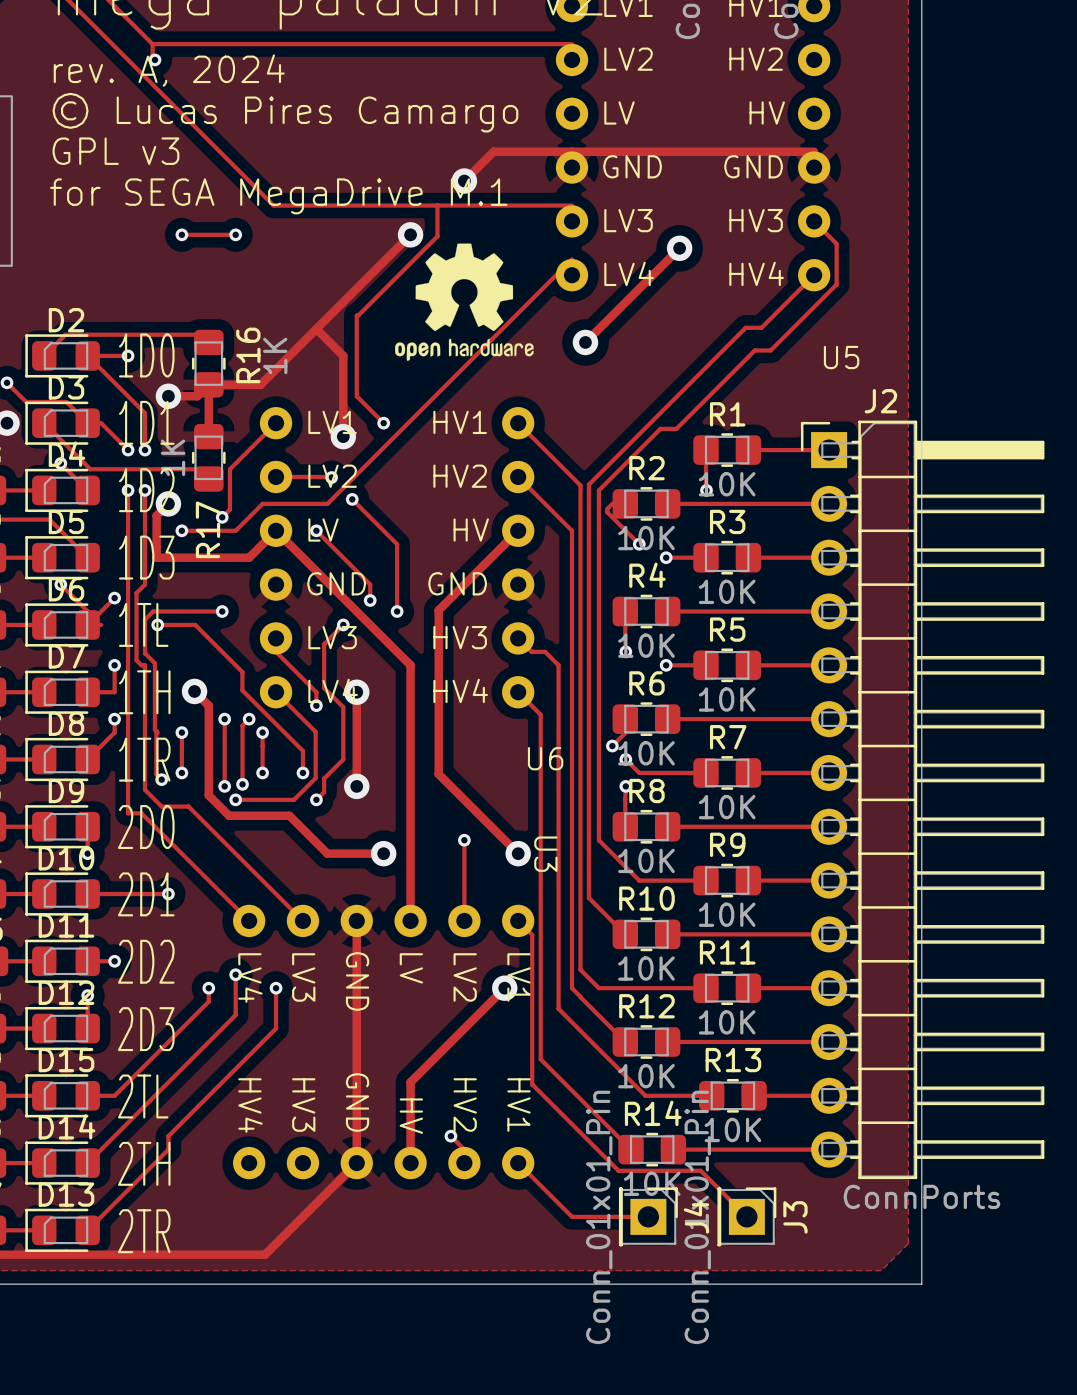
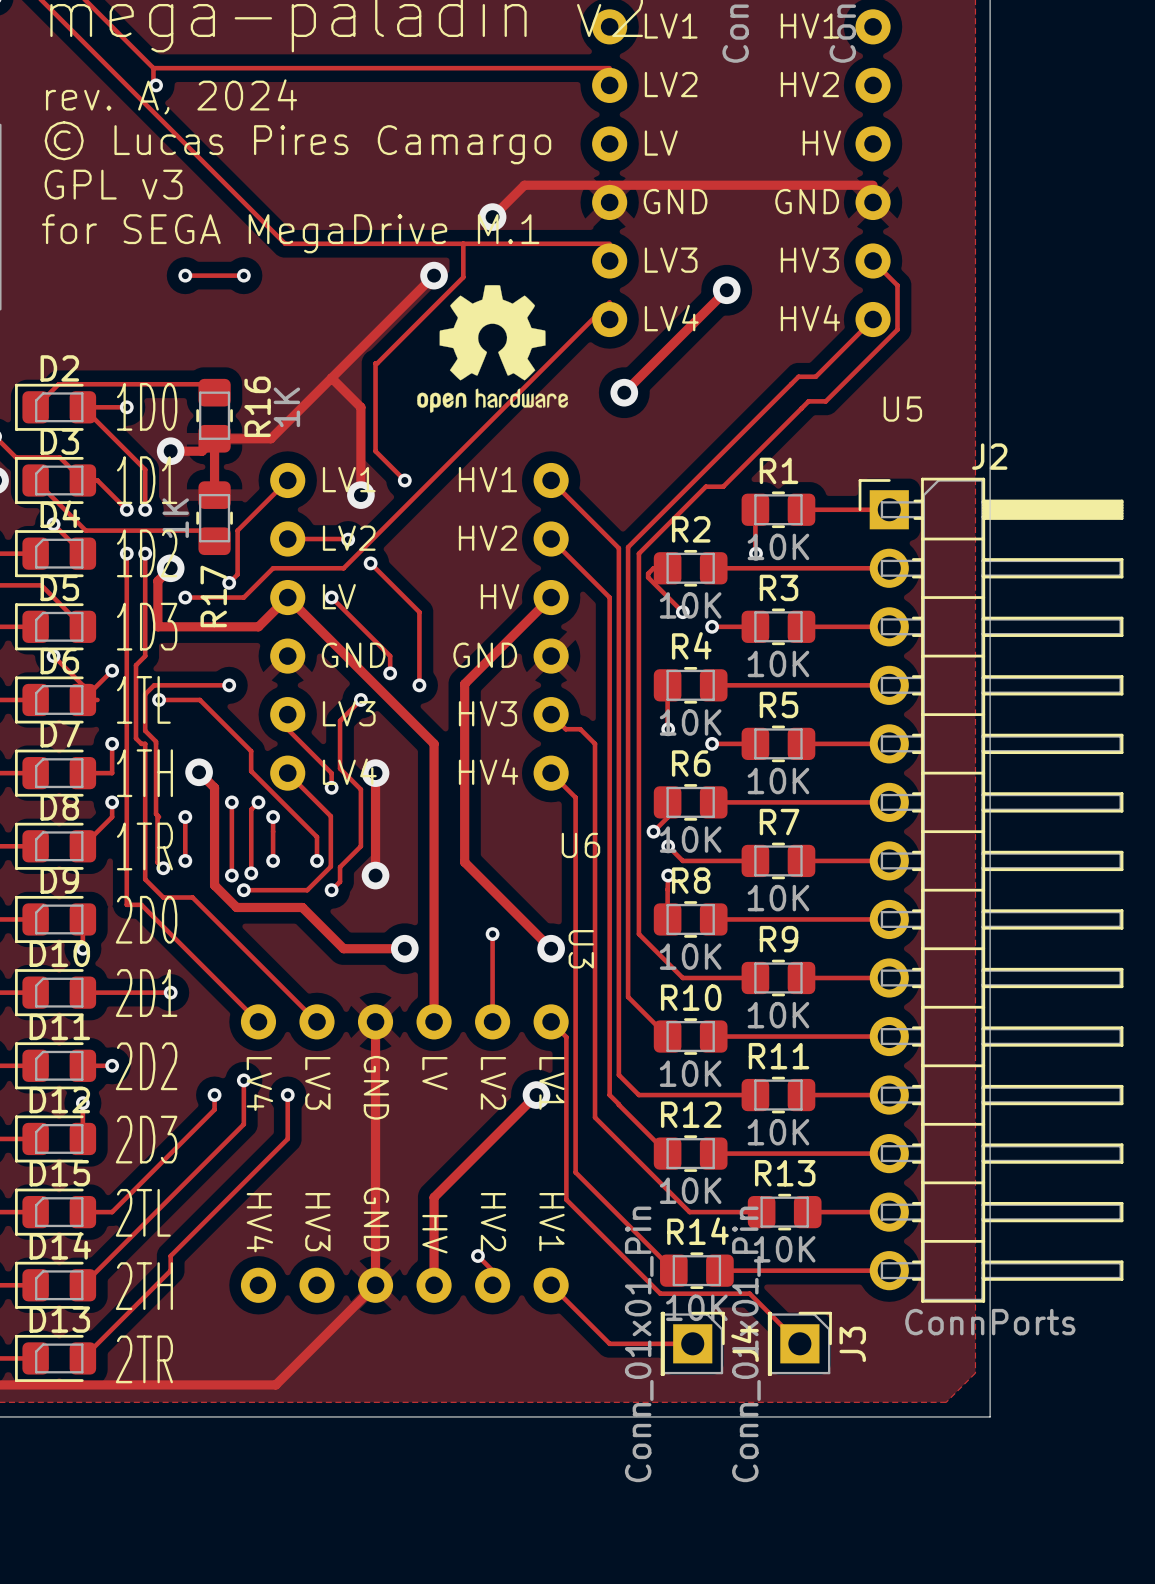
J2 name position: J2 (880, 401) -> J2 (989, 456)

